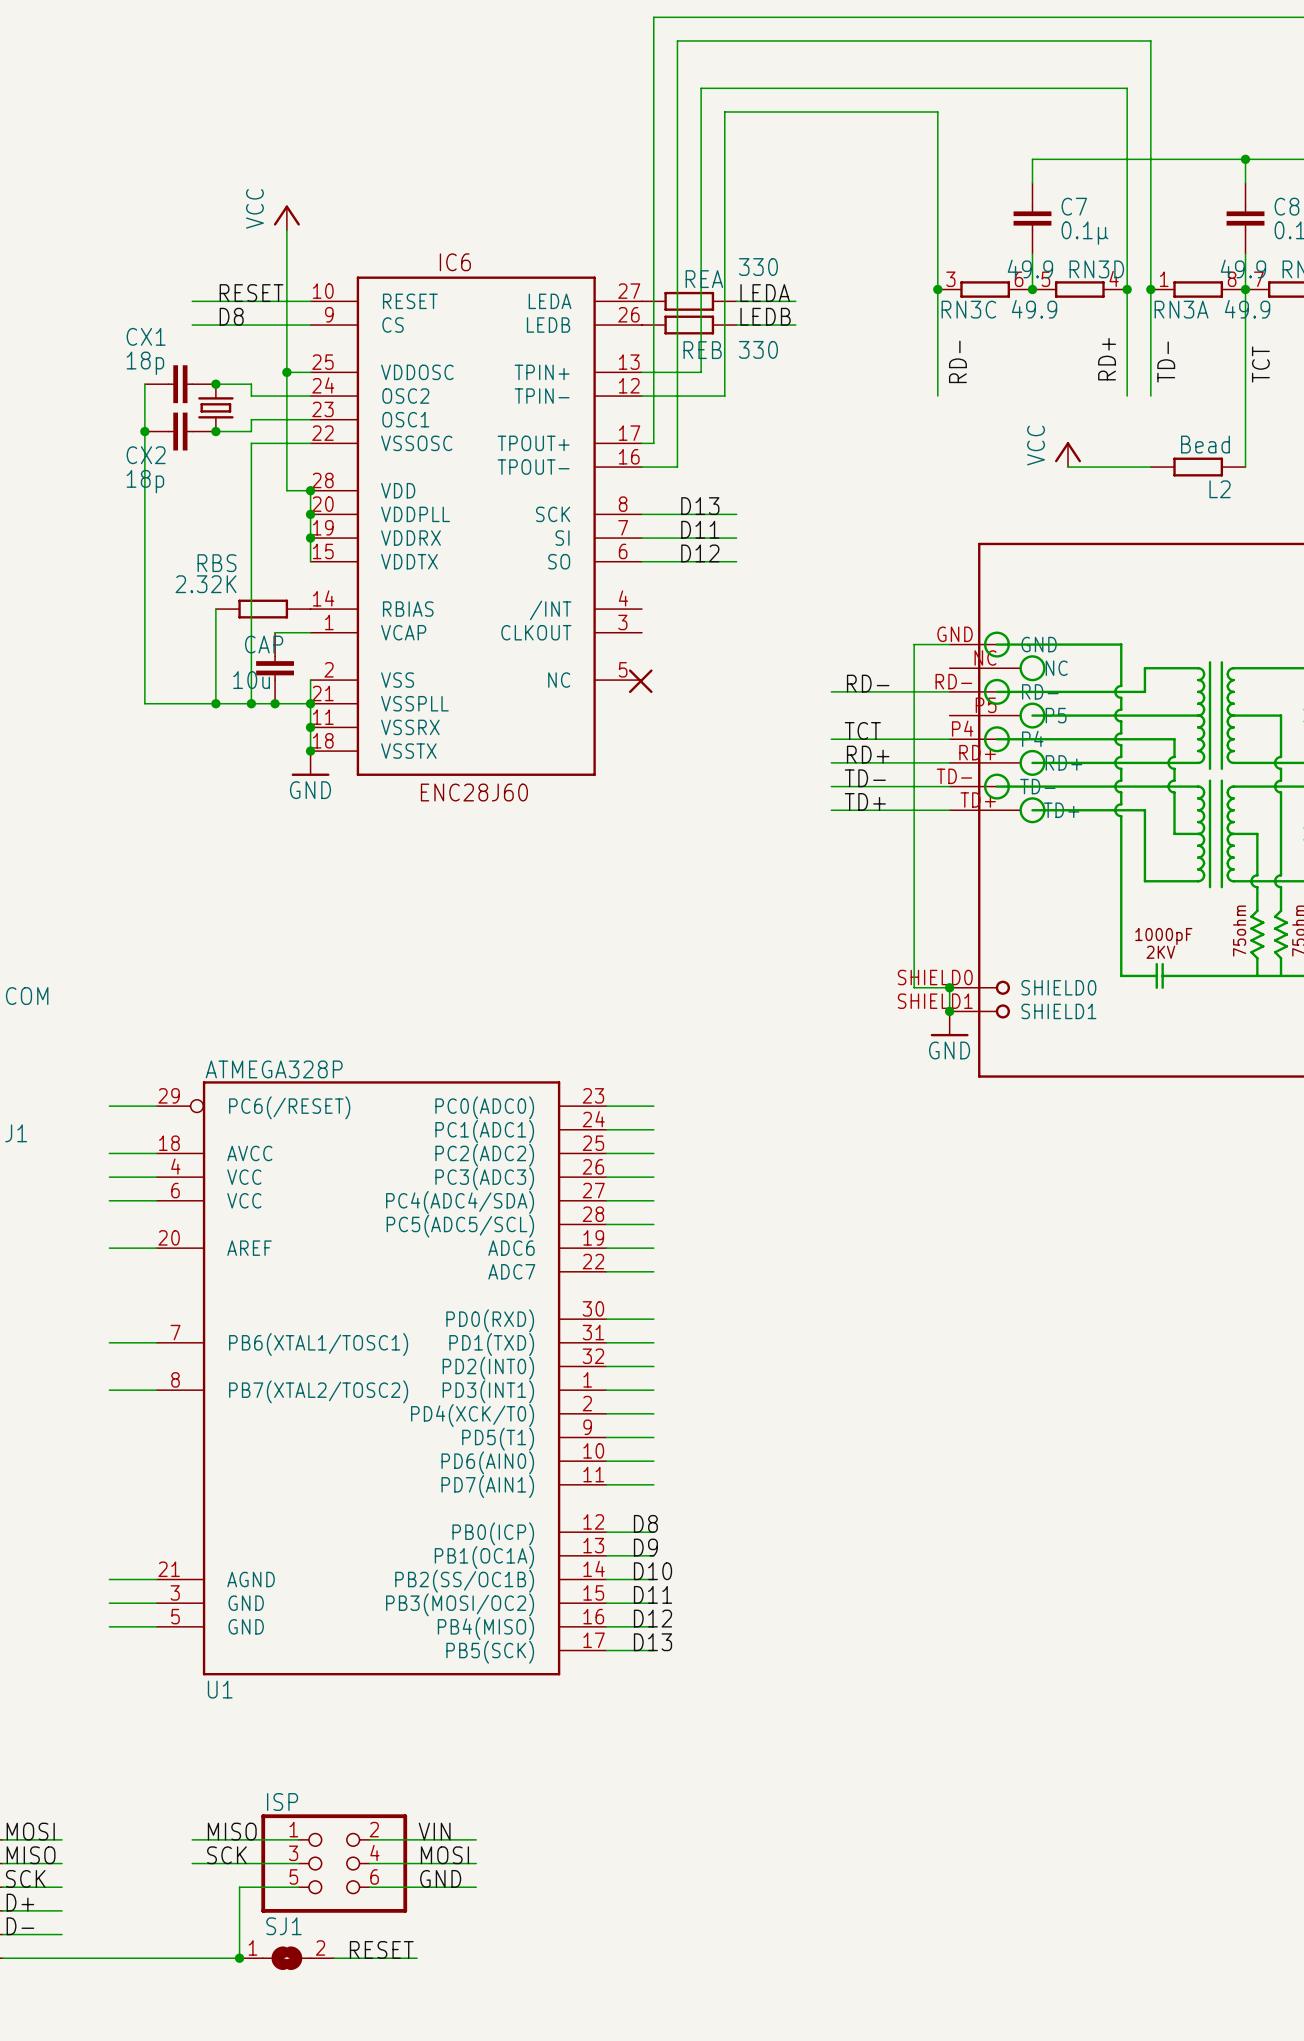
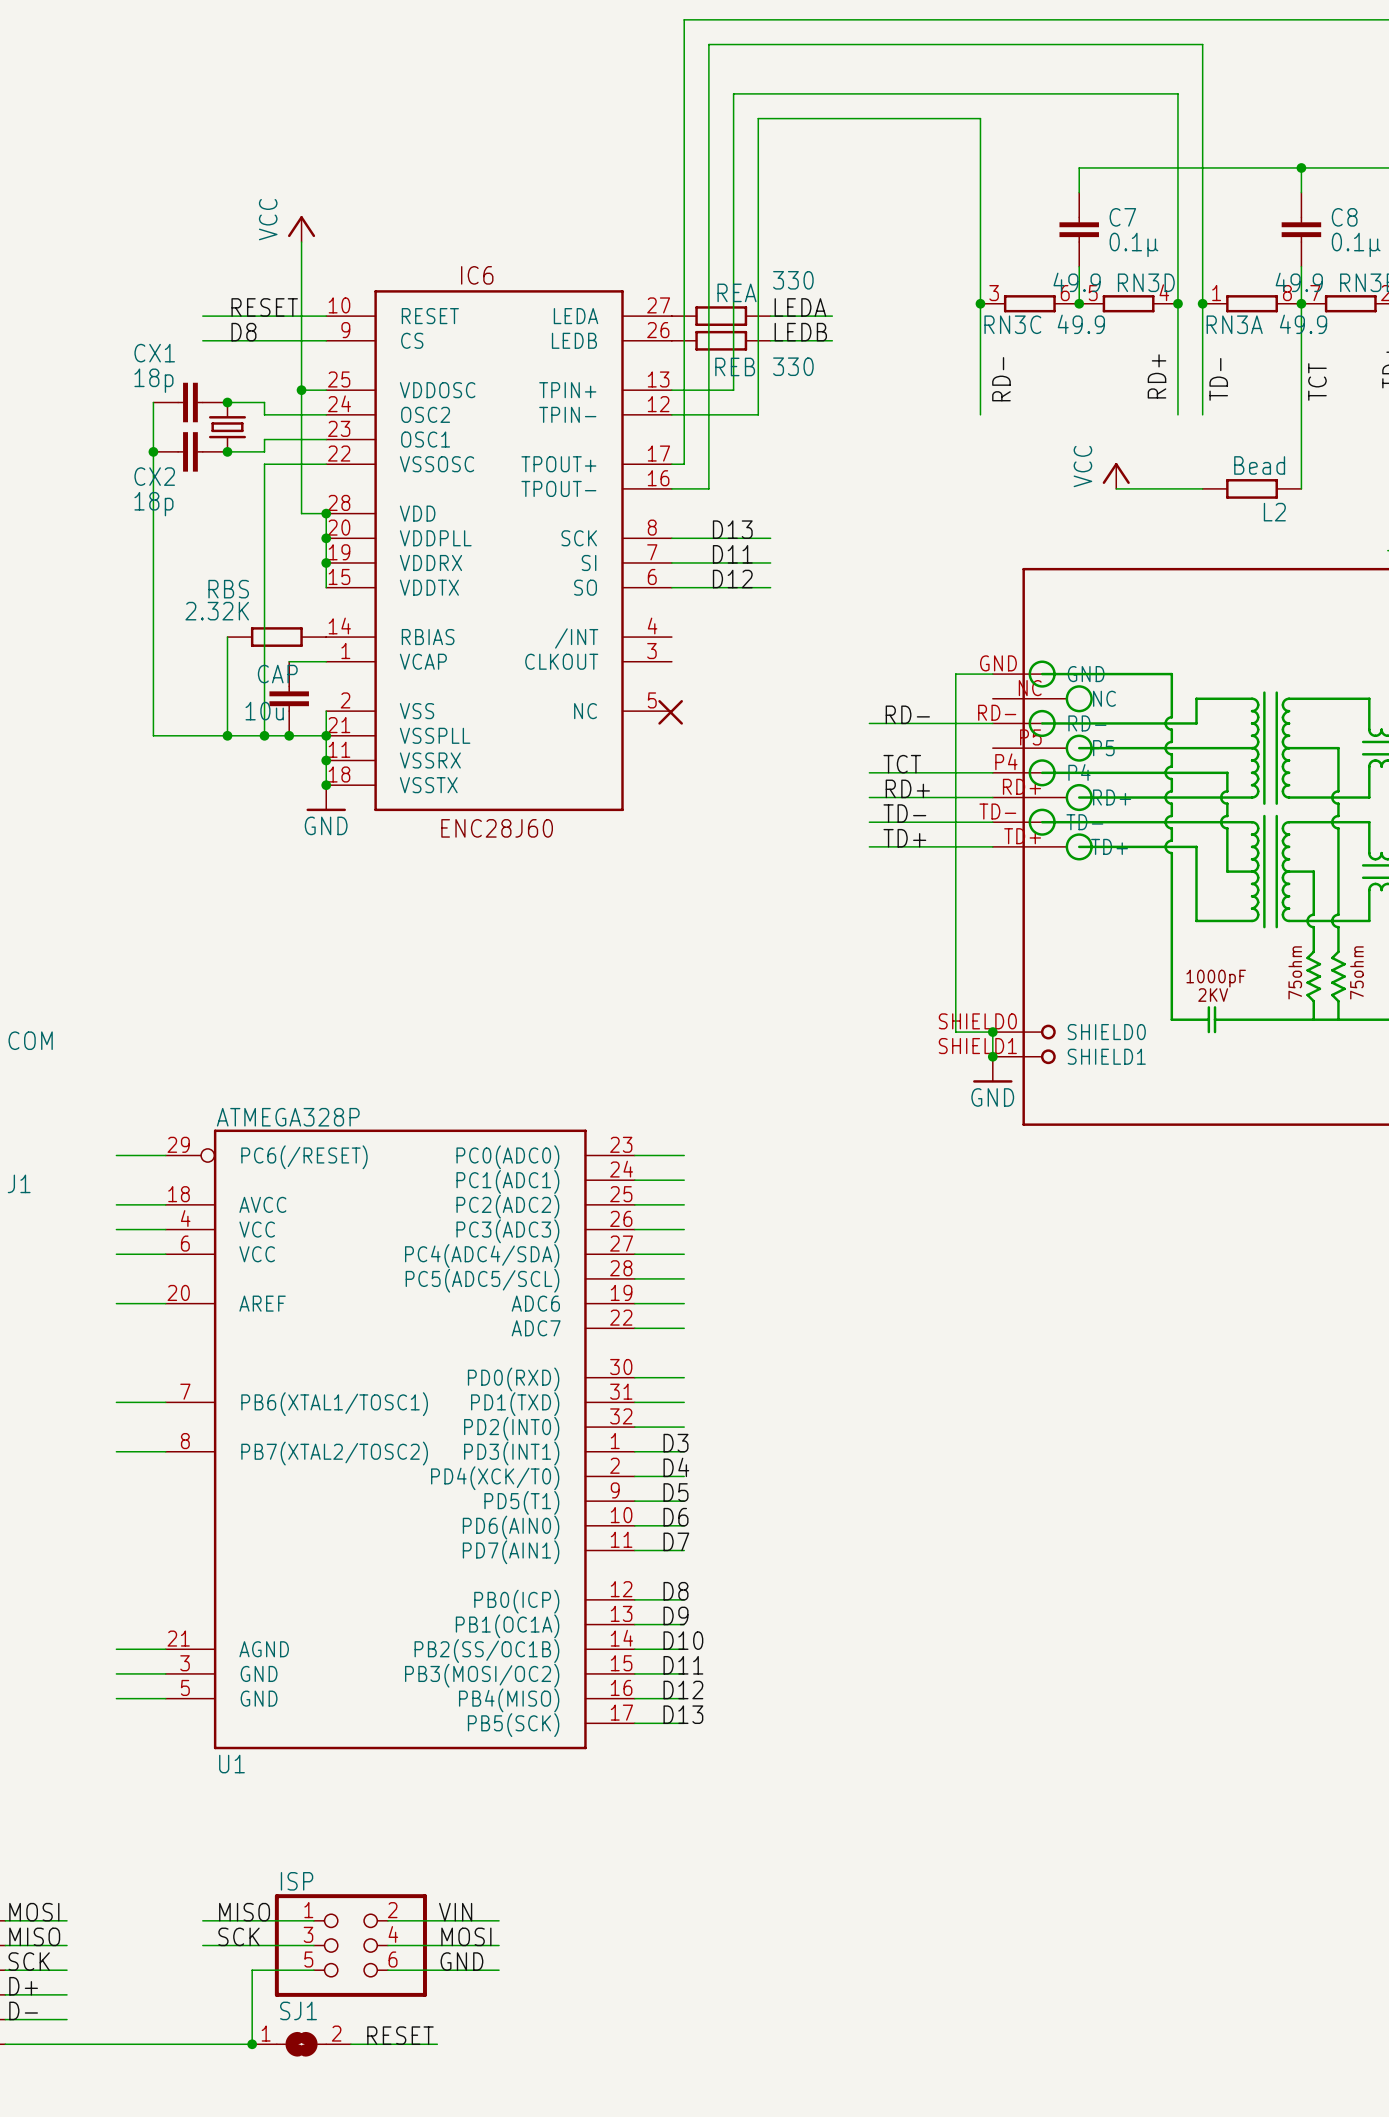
label: none -> D3 (675, 1443)
label: none -> D4 (676, 1467)
label: none -> D5 (675, 1492)
label: none -> D6 (675, 1517)
label: none -> D7 (676, 1541)

